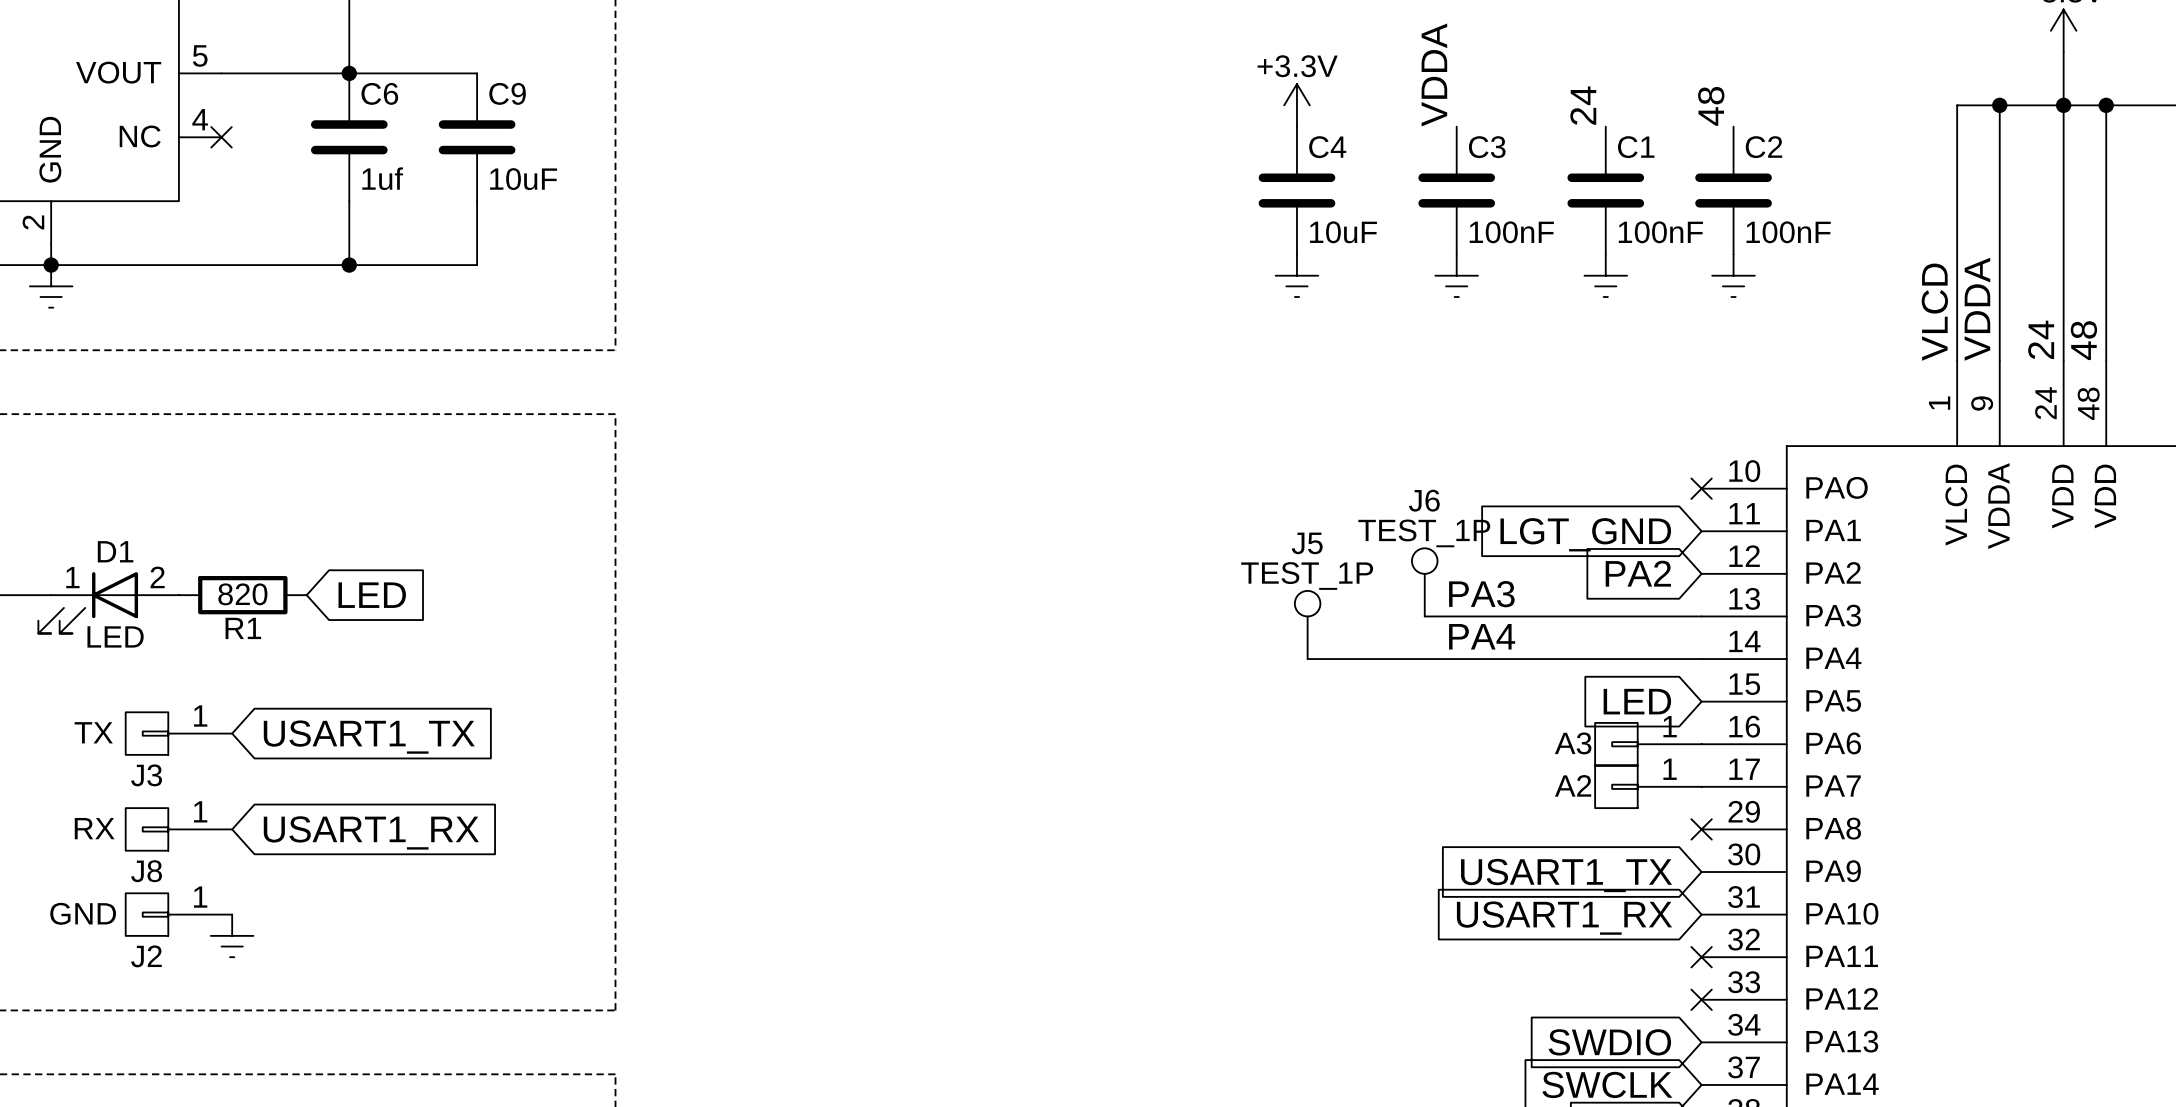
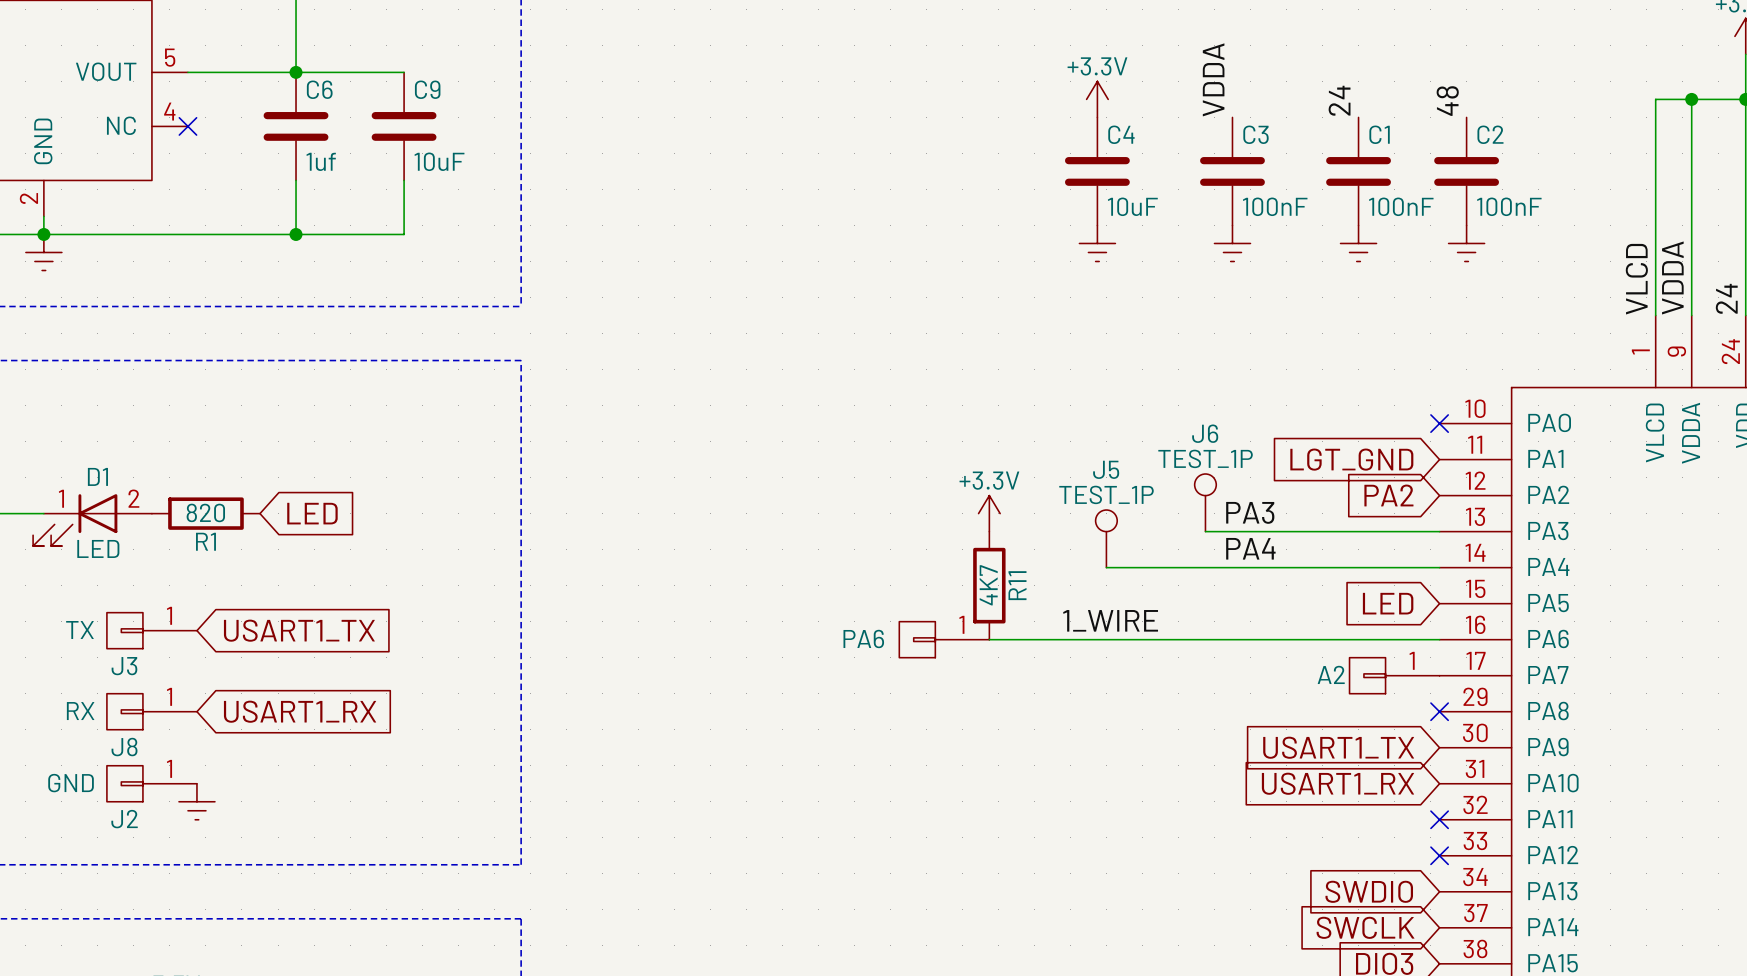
power symbol: none -> +3.3V (989, 513)
R11: none -> 4K7 (989, 585)
label: none -> 1_WIRE (1110, 620)
PA6: none -> (944, 639)
wire: none -> (989, 639) (1439, 639)
A3: (1648, 744) -> none

